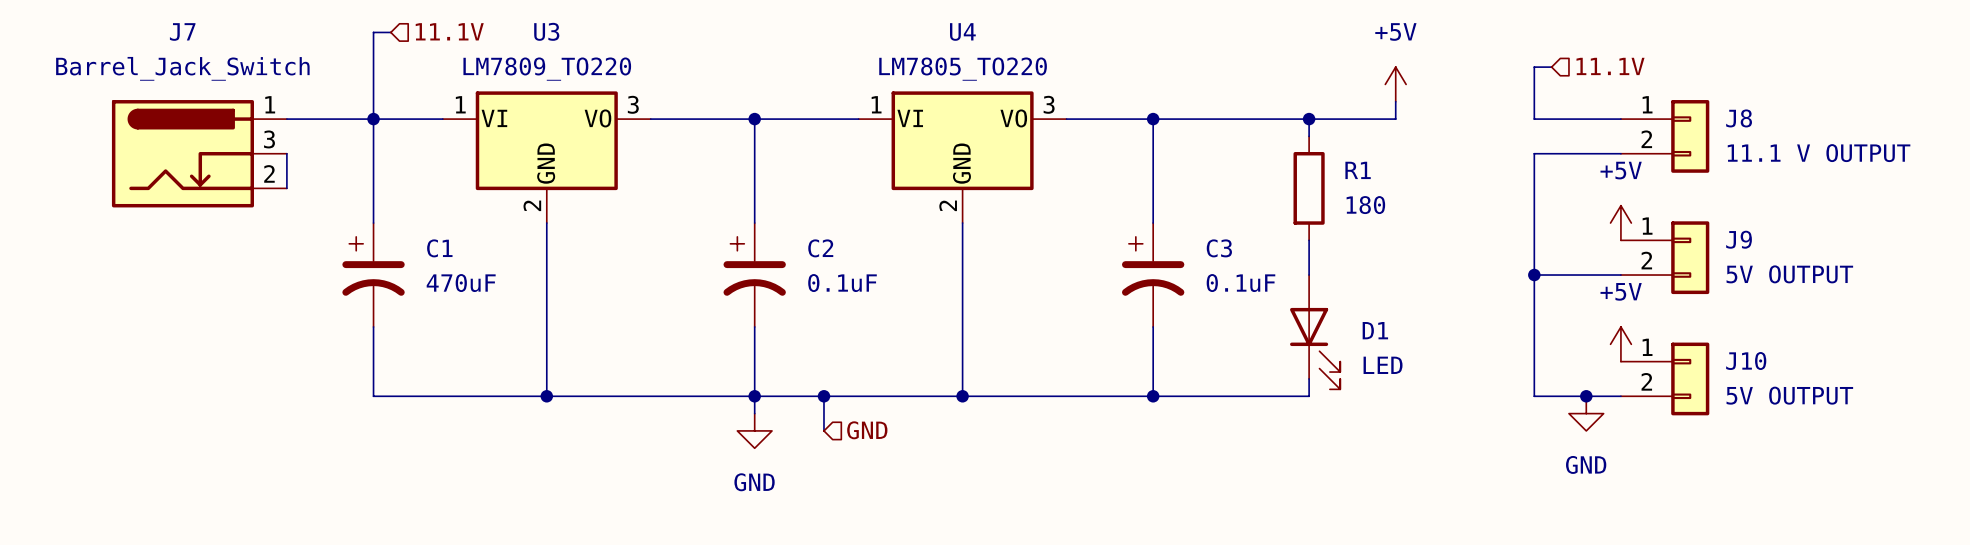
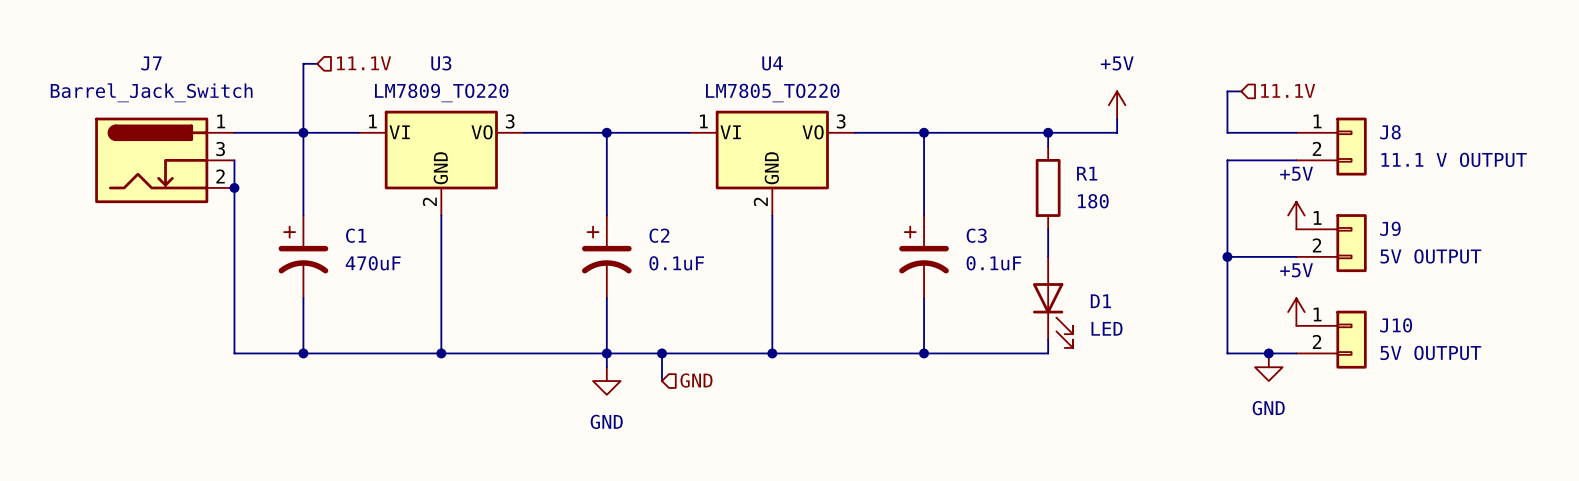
wire: none -> (234, 187) (234, 353) (303, 353)
junction: none -> (234, 187)
junction: none -> (303, 353)

